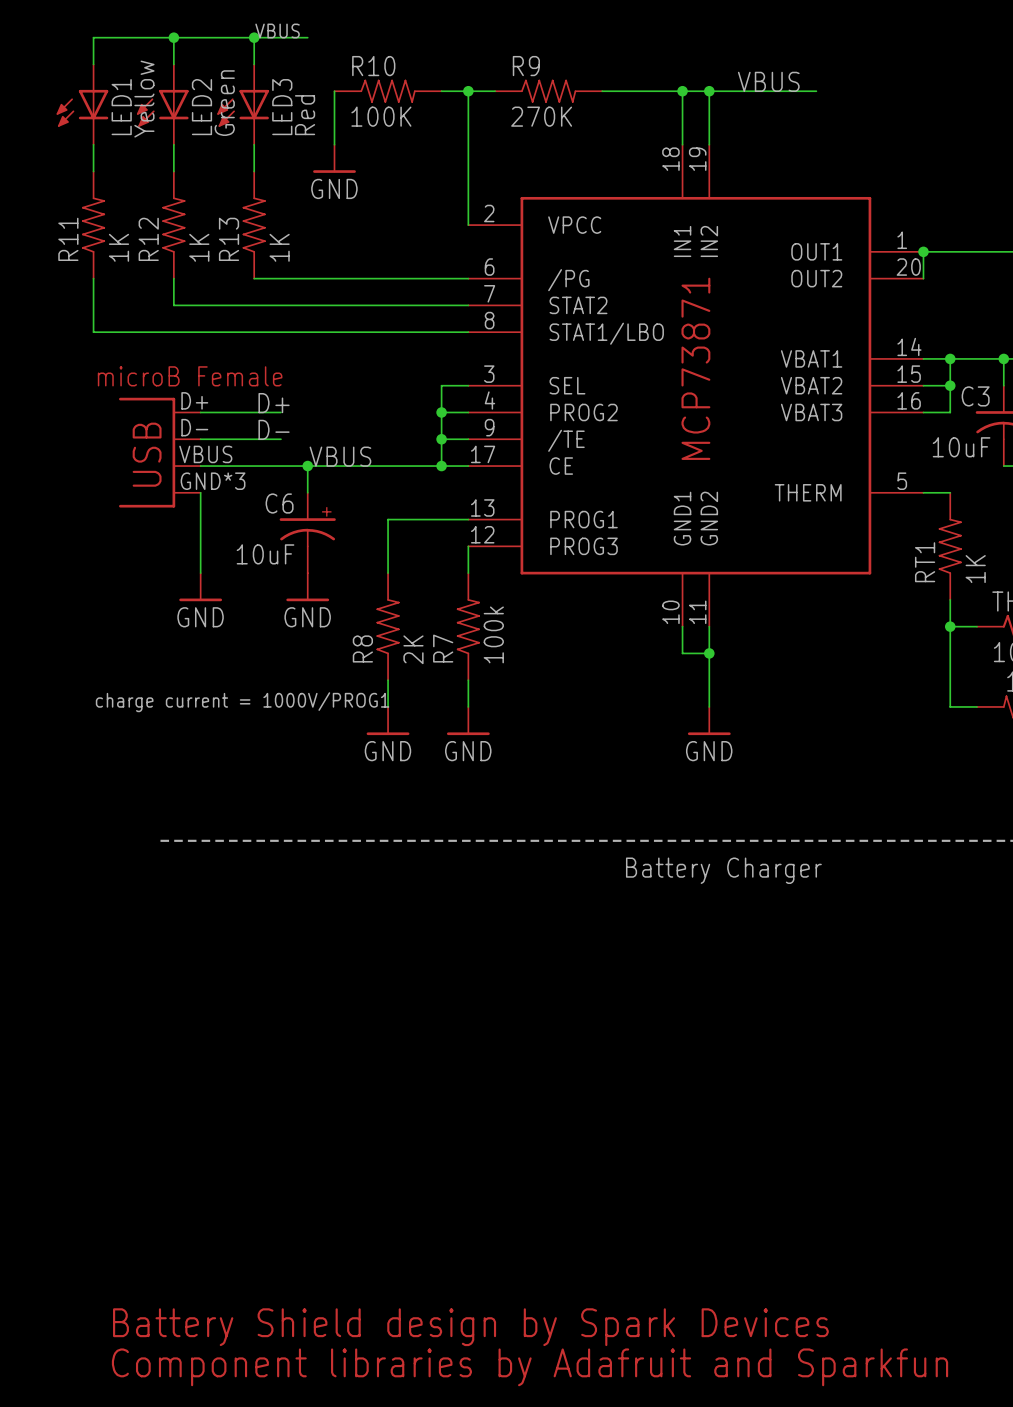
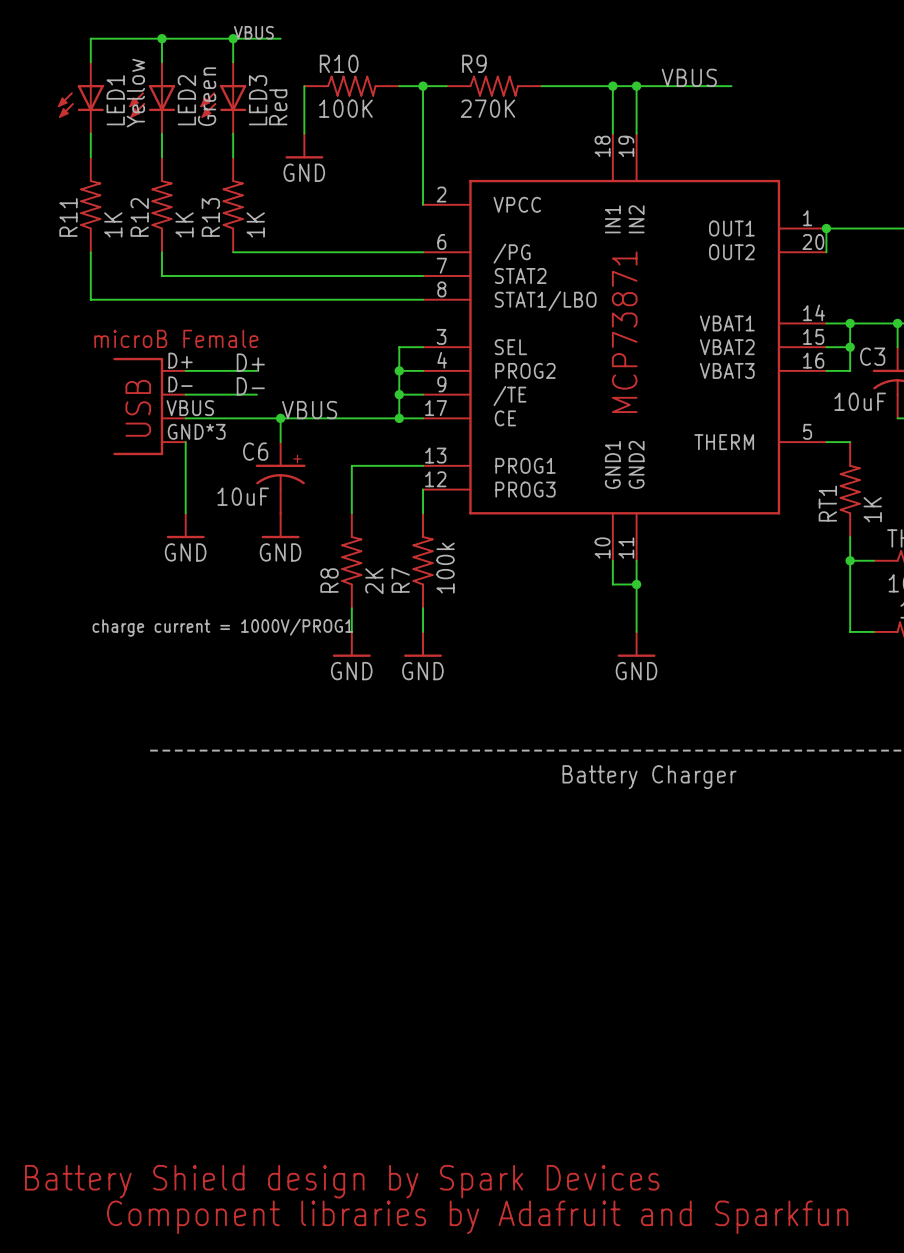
text position: Battery Shield design by Spark Devices (470, 1327) -> Battery Shield design by Spark Devices (342, 1181)

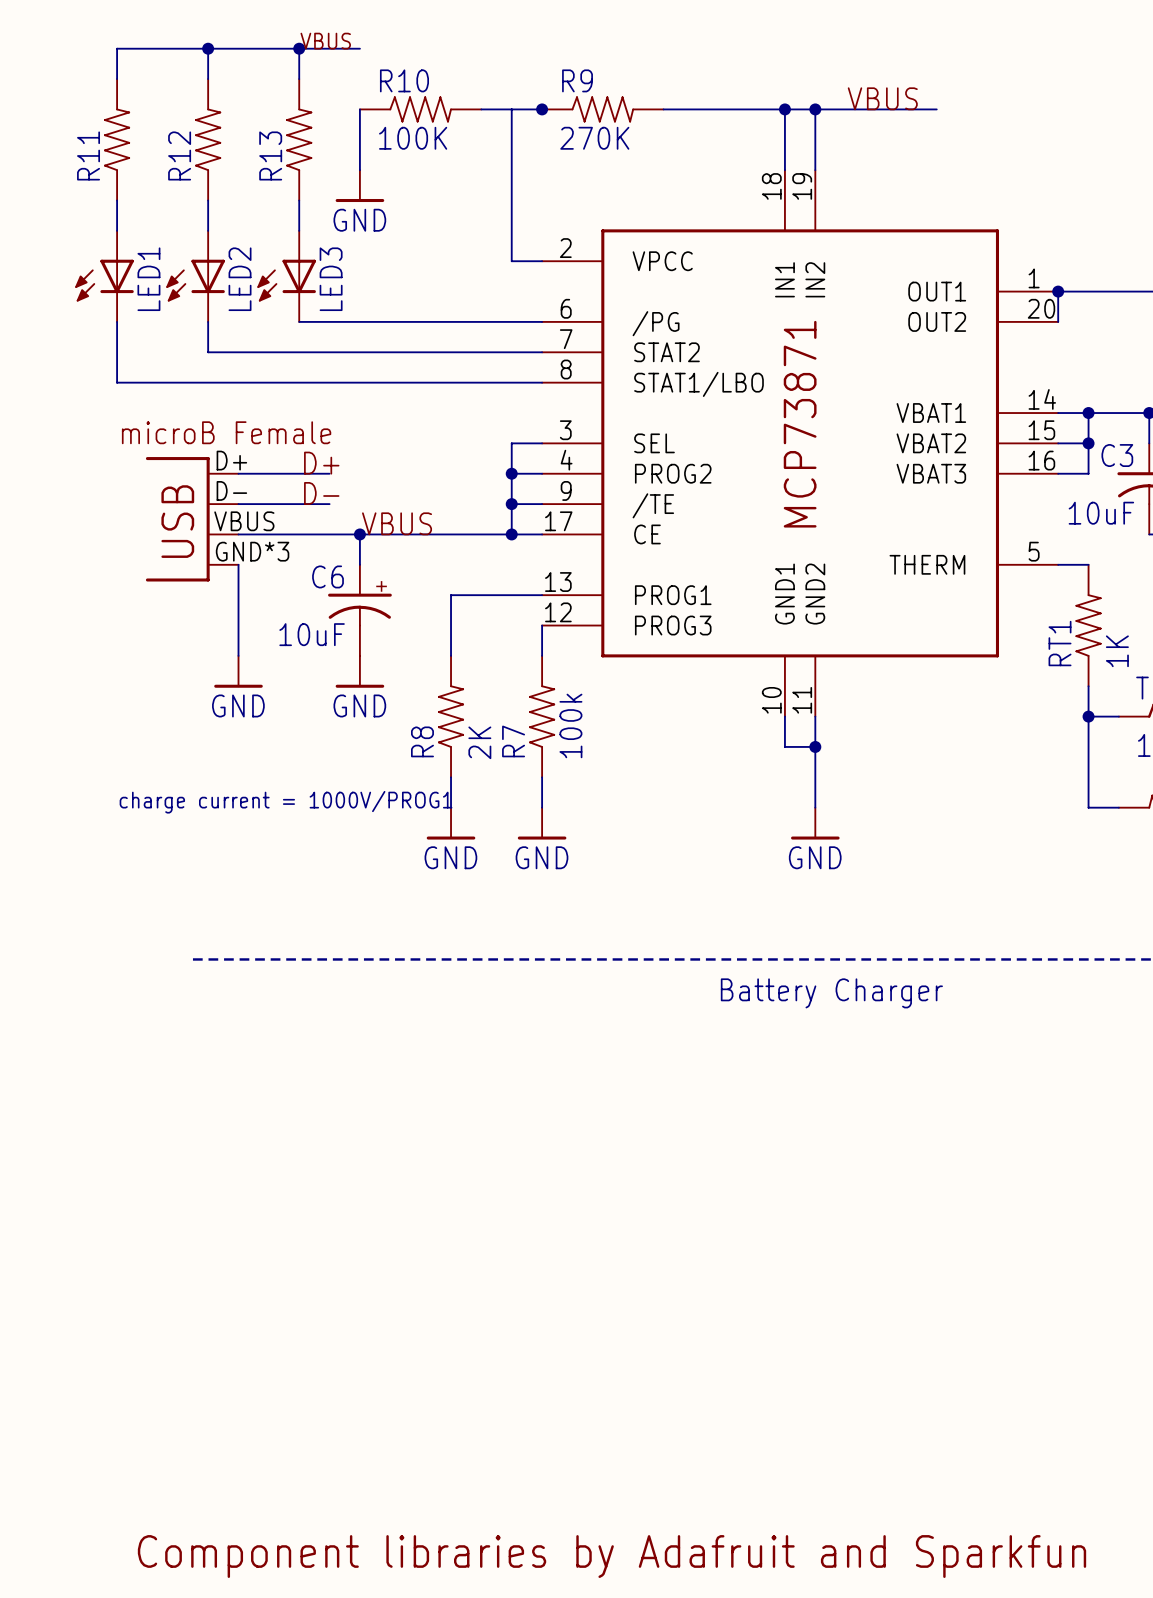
wire: (304, 86) (304, 133) -> (359, 109) (359, 170)
R10 position: (351, 86) -> (420, 109)
wire: (446, 86) (423, 86) (423, 204) -> (481, 109) (511, 109) (511, 261) (542, 261)
R9 position: (494, 86) -> (602, 109)
LED1 value: Yellow (135, 93) -> none
LED2 value: Green (207, 96) -> none
LED1 position: (80, 98) -> (104, 276)
LED2 position: (152, 98) -> (195, 276)
LED3 position: (223, 98) -> (286, 276)
LED3 value: Red (278, 107) -> none
power symbol position: GND (304, 146) -> GND (359, 186)
R11 position: (90, 204) -> (117, 139)
R12 position: (161, 204) -> (208, 139)
R13 position: (233, 204) -> (299, 139)
R11 value: 1K (113, 224) -> none
R12 value: 1K (184, 224) -> none
R13 value: 1K (255, 224) -> none
text: Battery Shield design by Spark Devices (342, 1181) -> none

